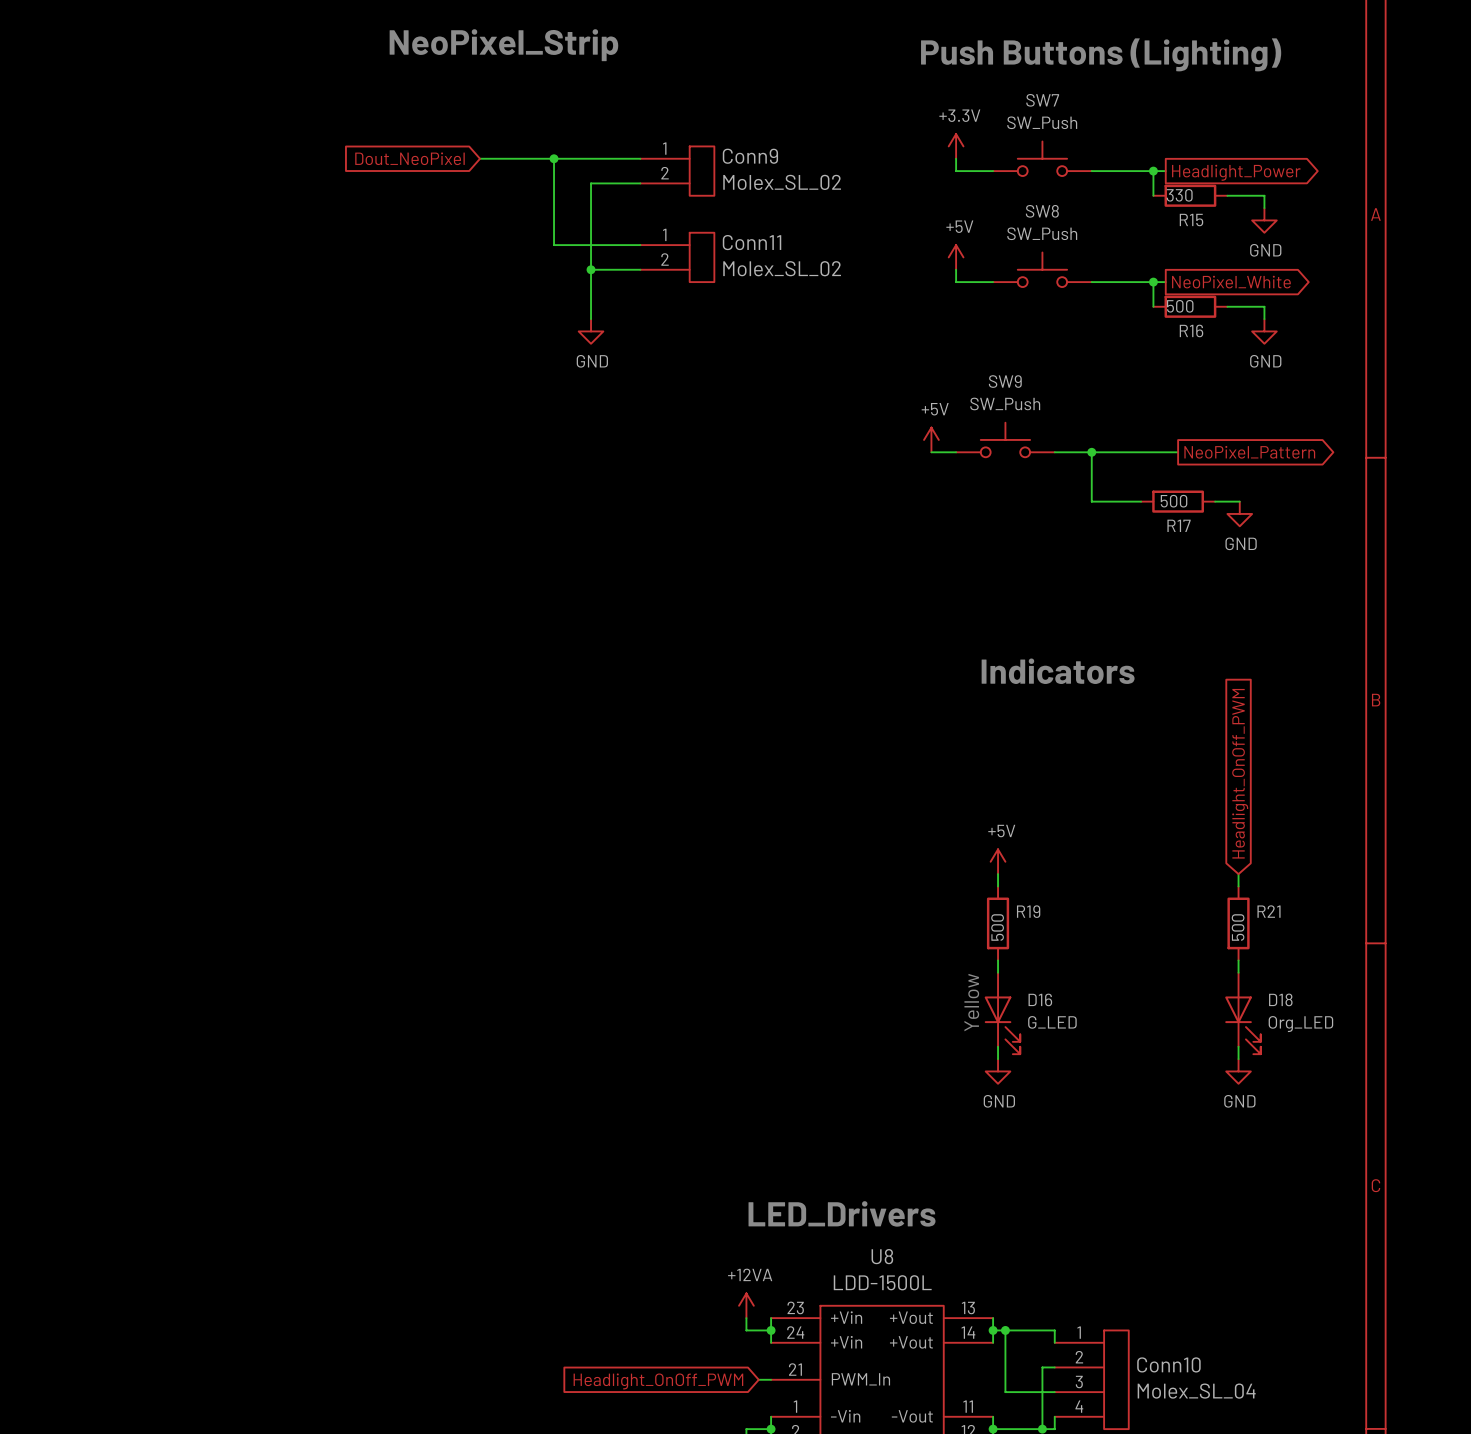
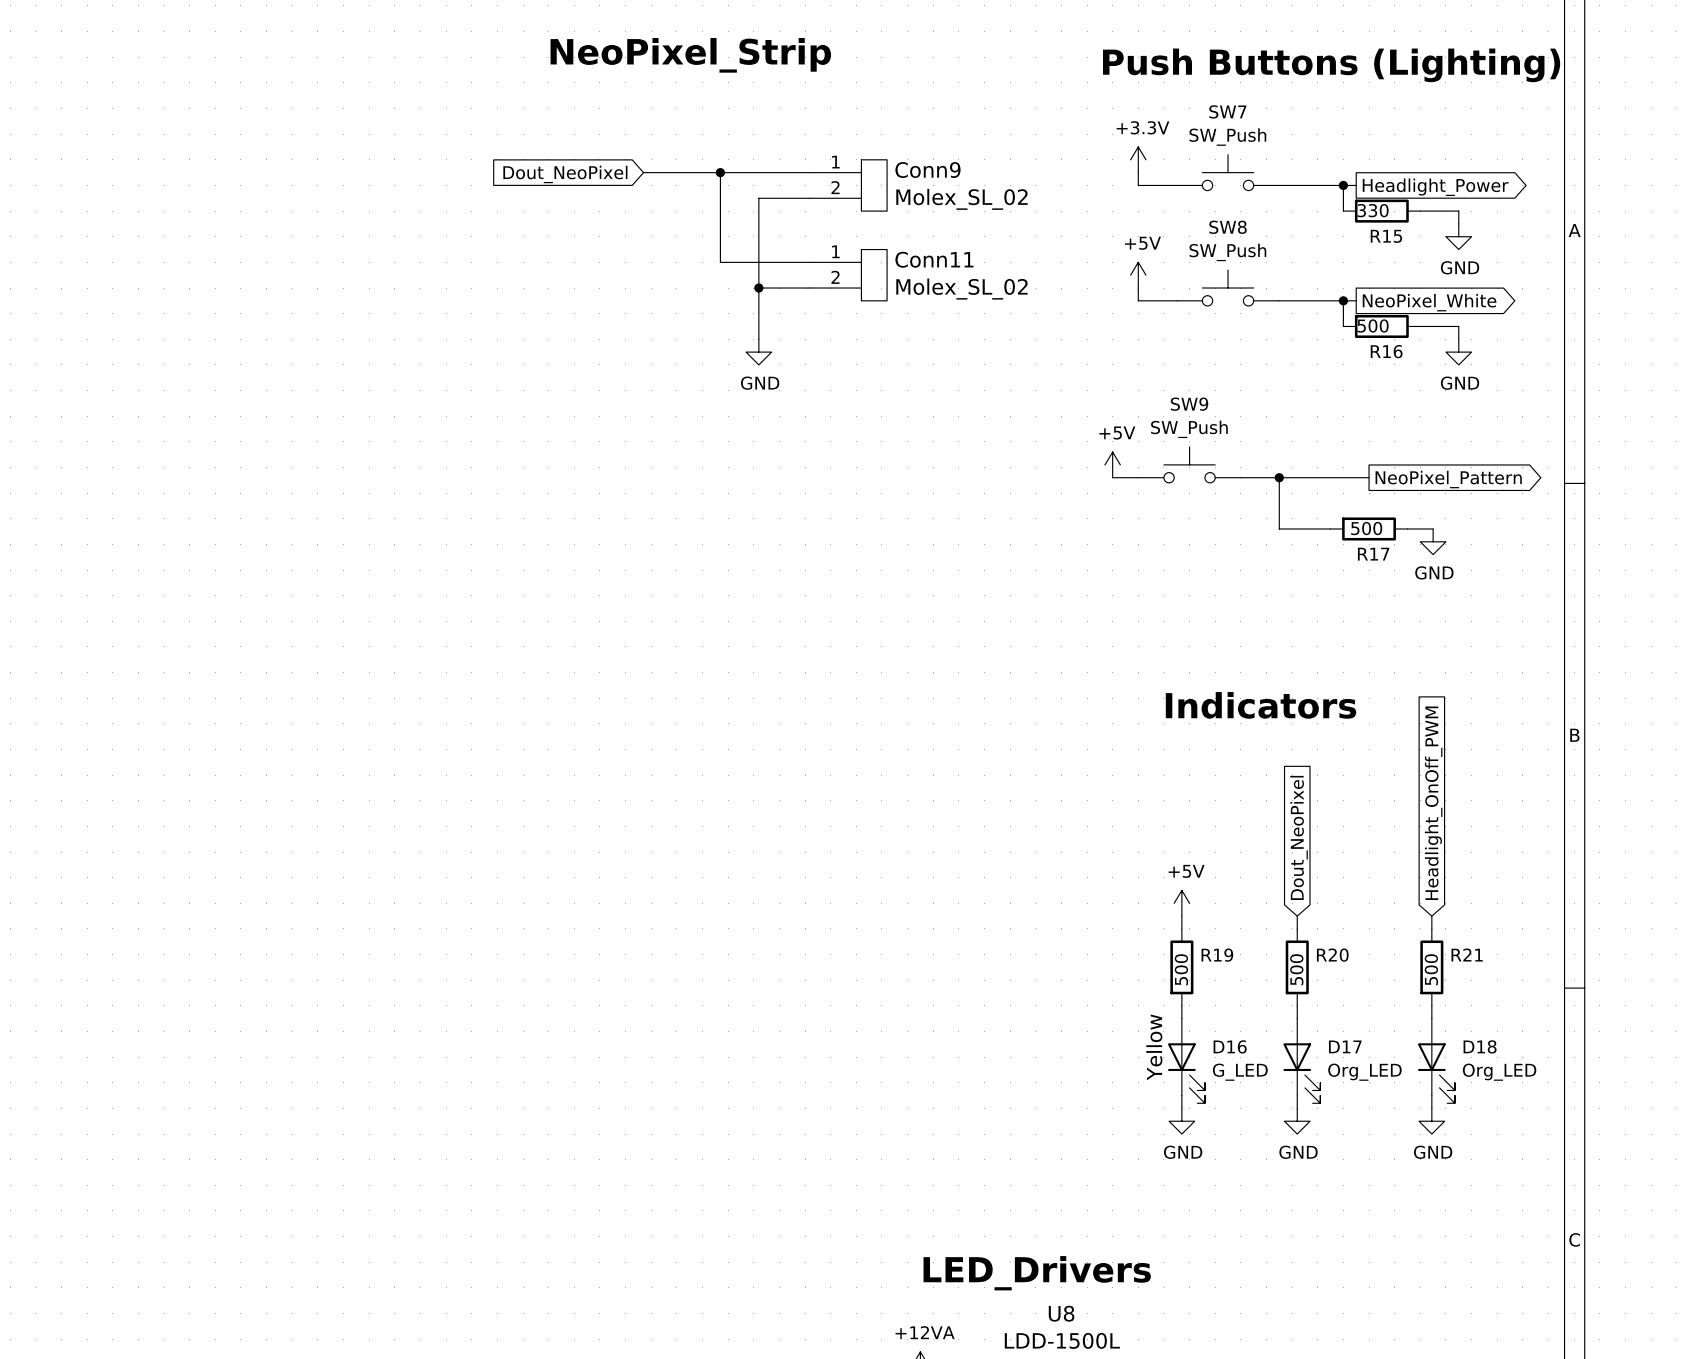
global label: none -> Dout_NeoPixel (1299, 837)
wire: none -> (1297, 916) (1297, 928)
R20: none -> 500 (1297, 967)
wire: none -> (1297, 1005) (1297, 1018)
D17: none -> Org_LED (1301, 1060)
wire: none -> (1297, 1095) (1297, 1108)
power symbol: none -> GND (1297, 1121)

